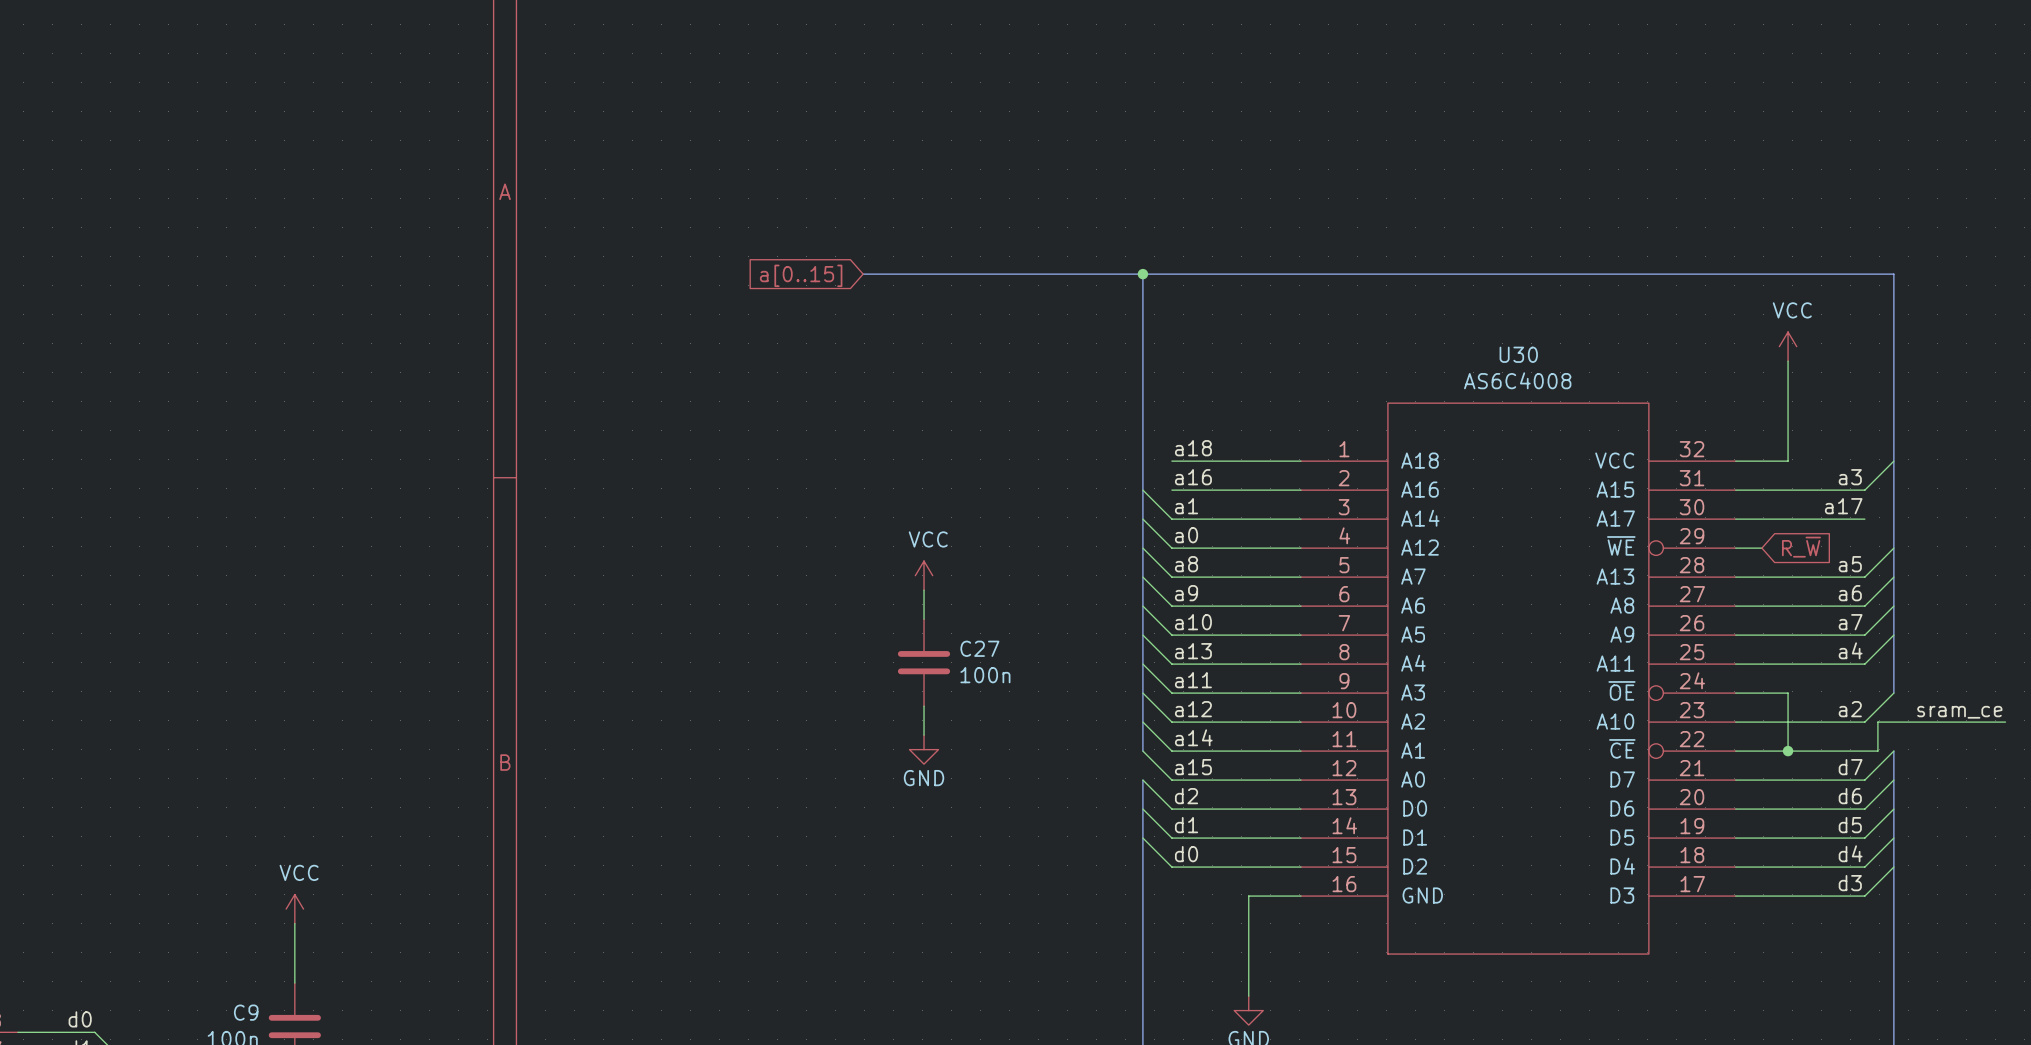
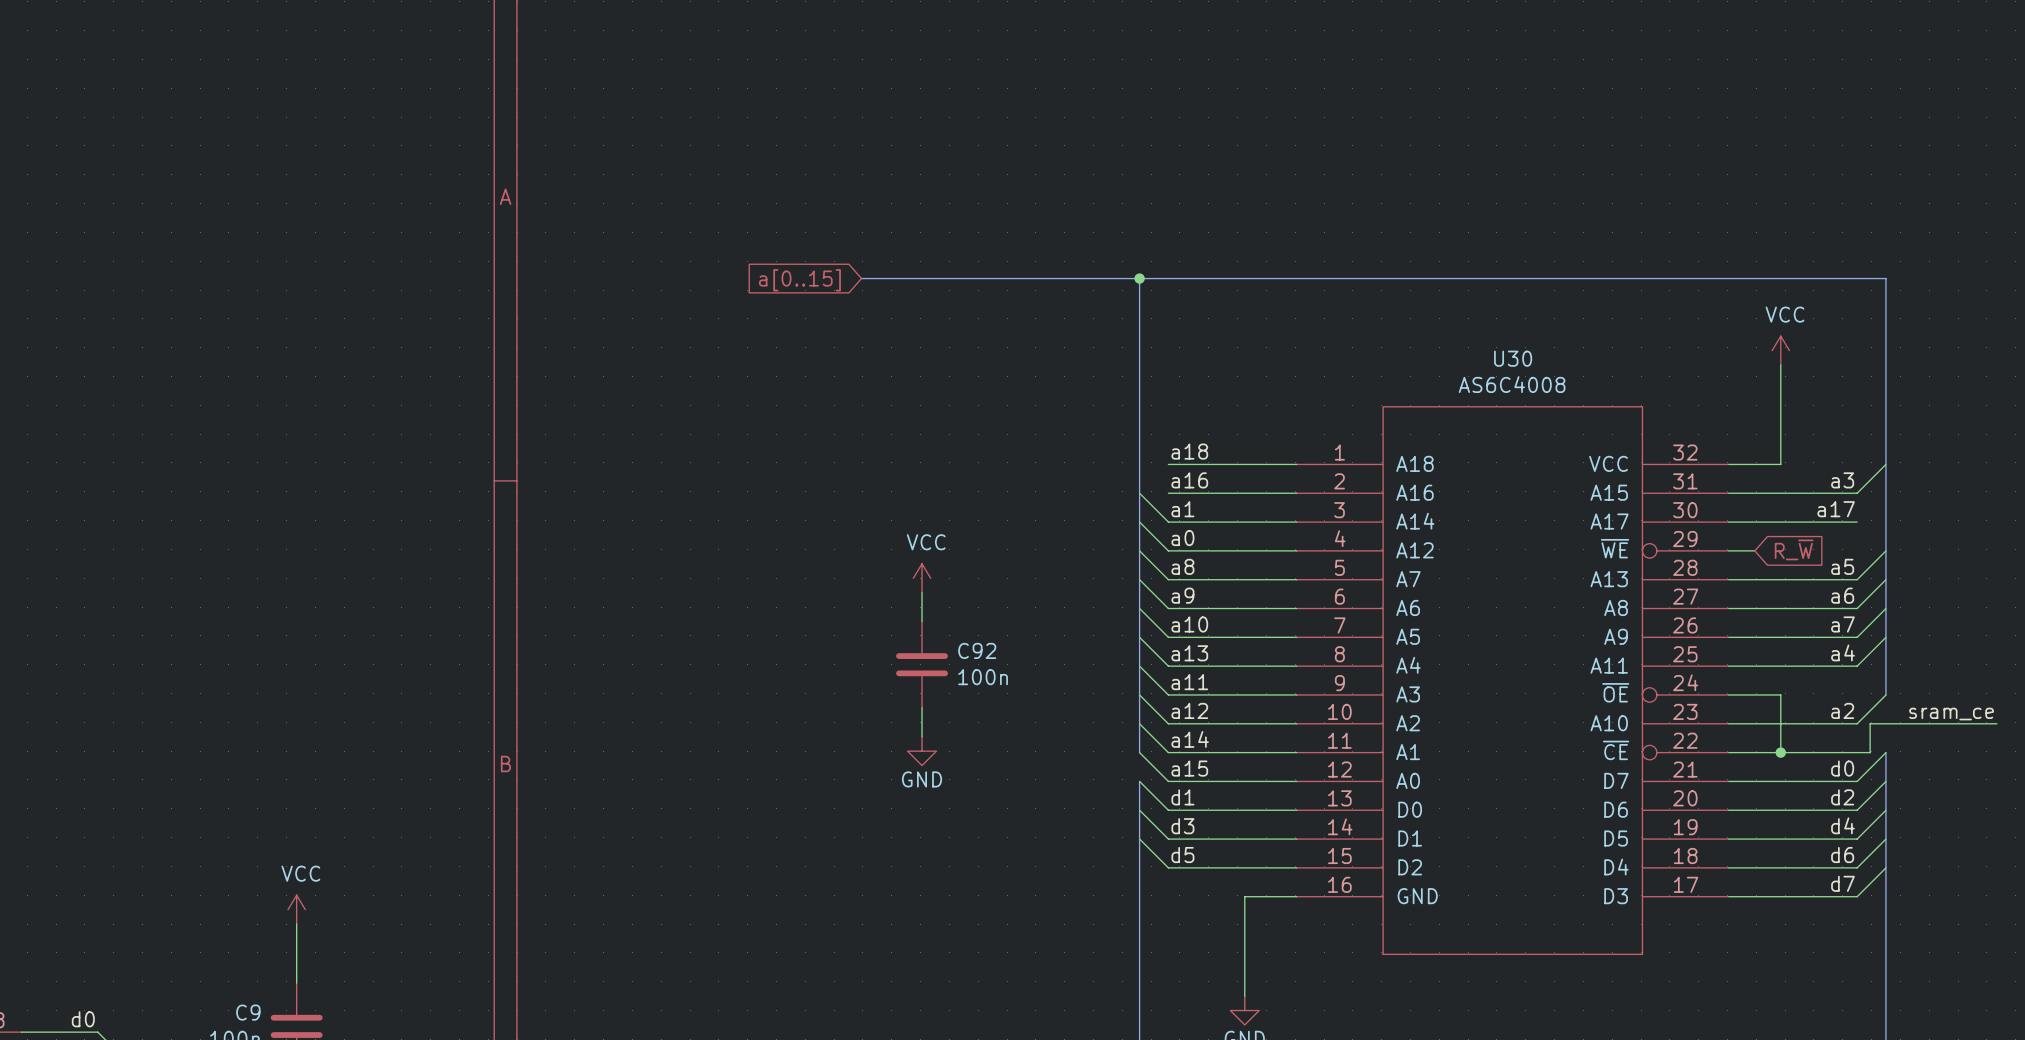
C27 name: C27 (979, 648) -> C92 (977, 650)
label: d7 (1850, 767) -> d0 (1842, 768)
label: d2 (1186, 796) -> d1 (1182, 797)
label: d6 (1850, 796) -> d2 (1842, 797)
label: d1 (1186, 825) -> d3 (1182, 826)
label: d5 (1850, 825) -> d4 (1842, 825)
label: d4 (1850, 853) -> d6 (1842, 855)
label: d0 (1186, 854) -> d5 (1182, 855)
label: d3 (1850, 883) -> d7 (1842, 883)

